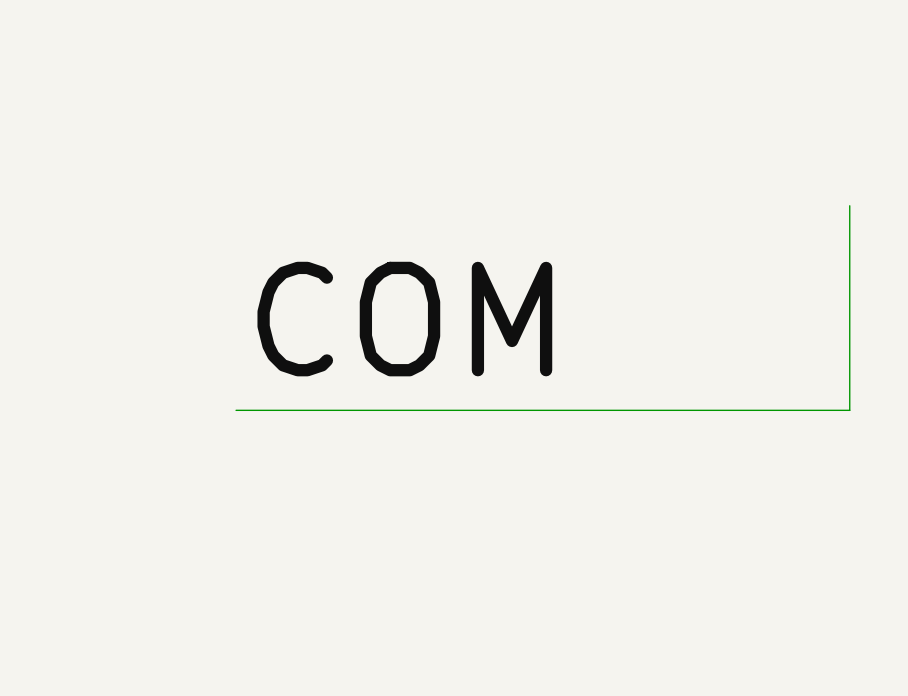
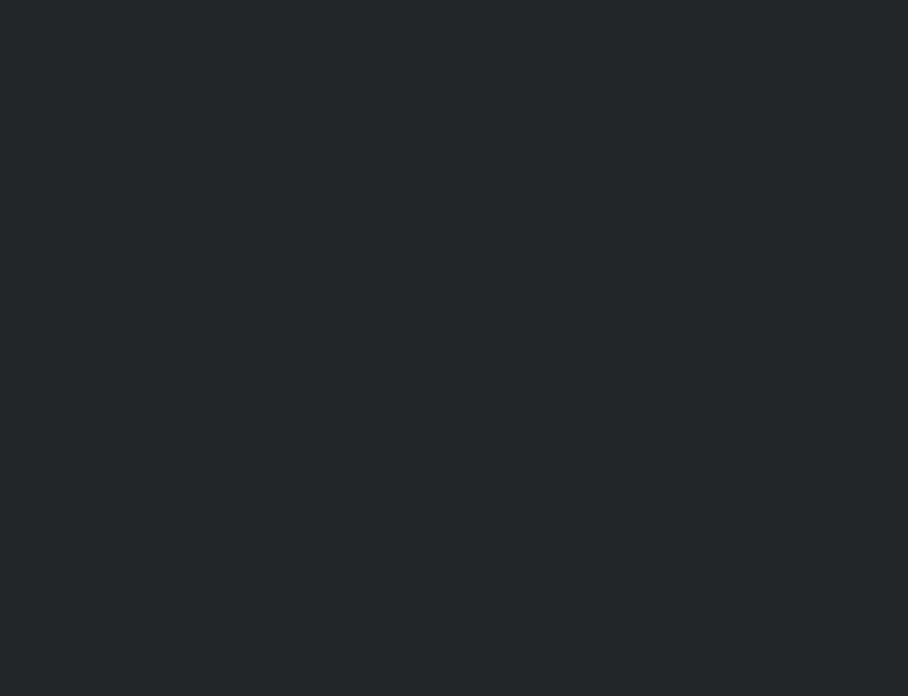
wire: (849, 205) (849, 410) (236, 410) -> none
label: COM (404, 319) -> none

